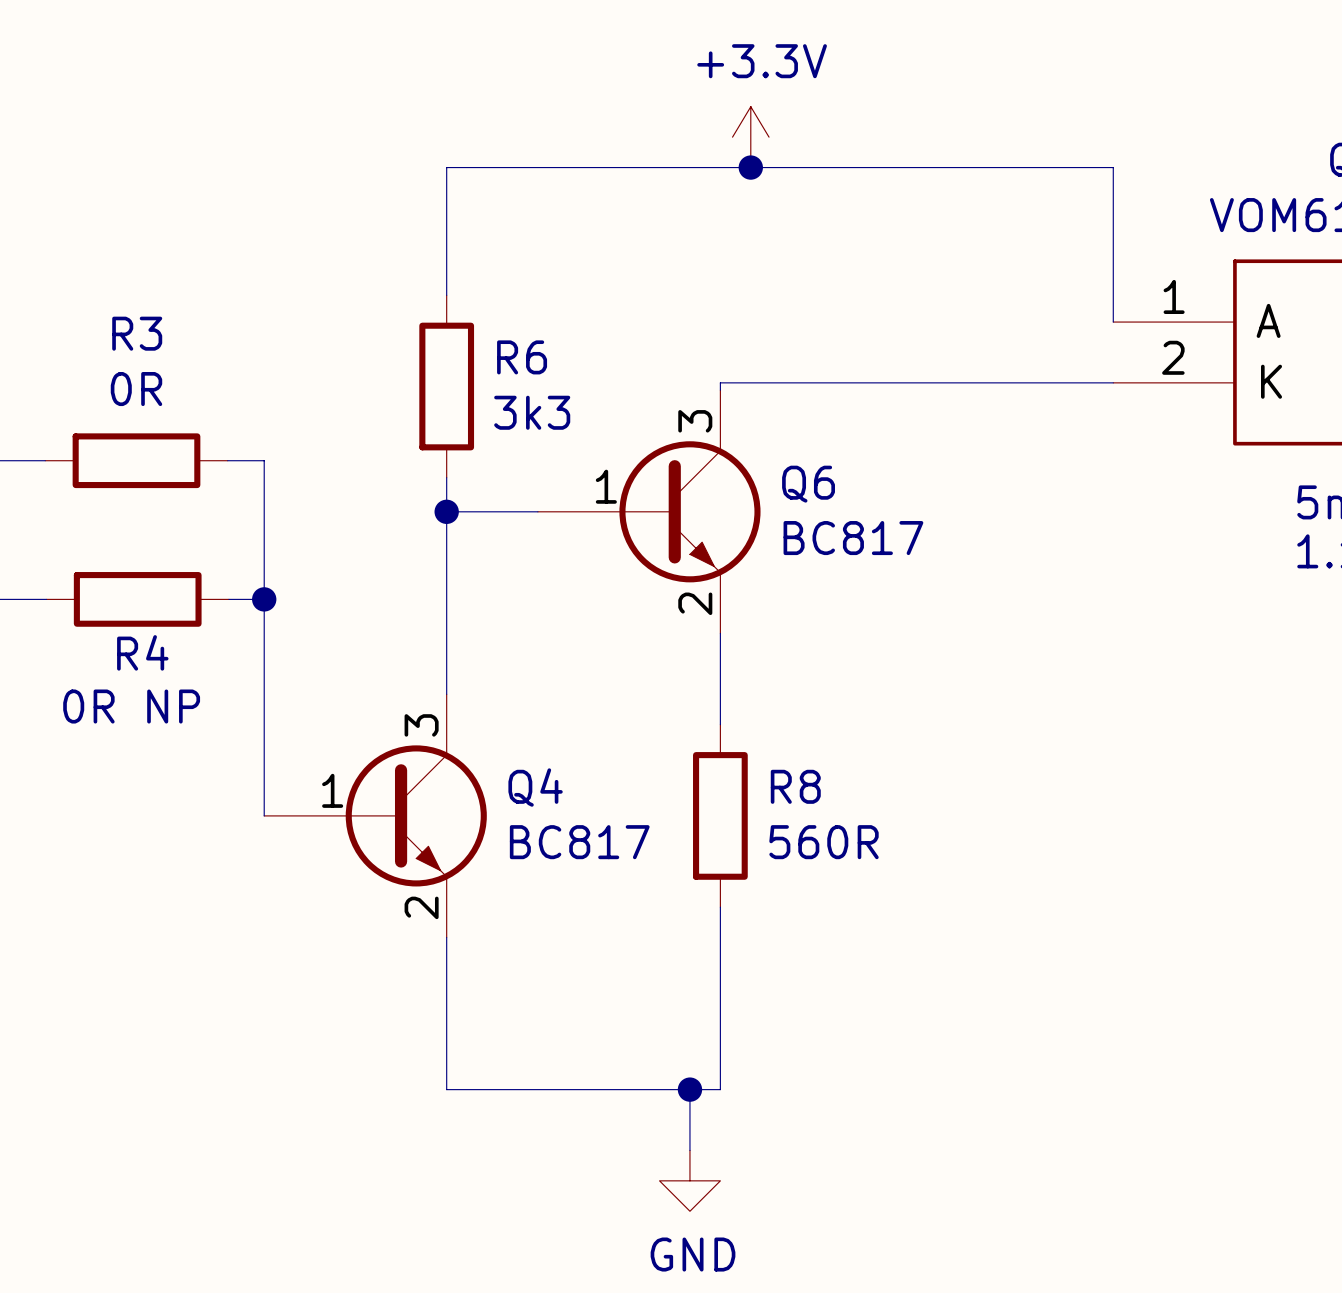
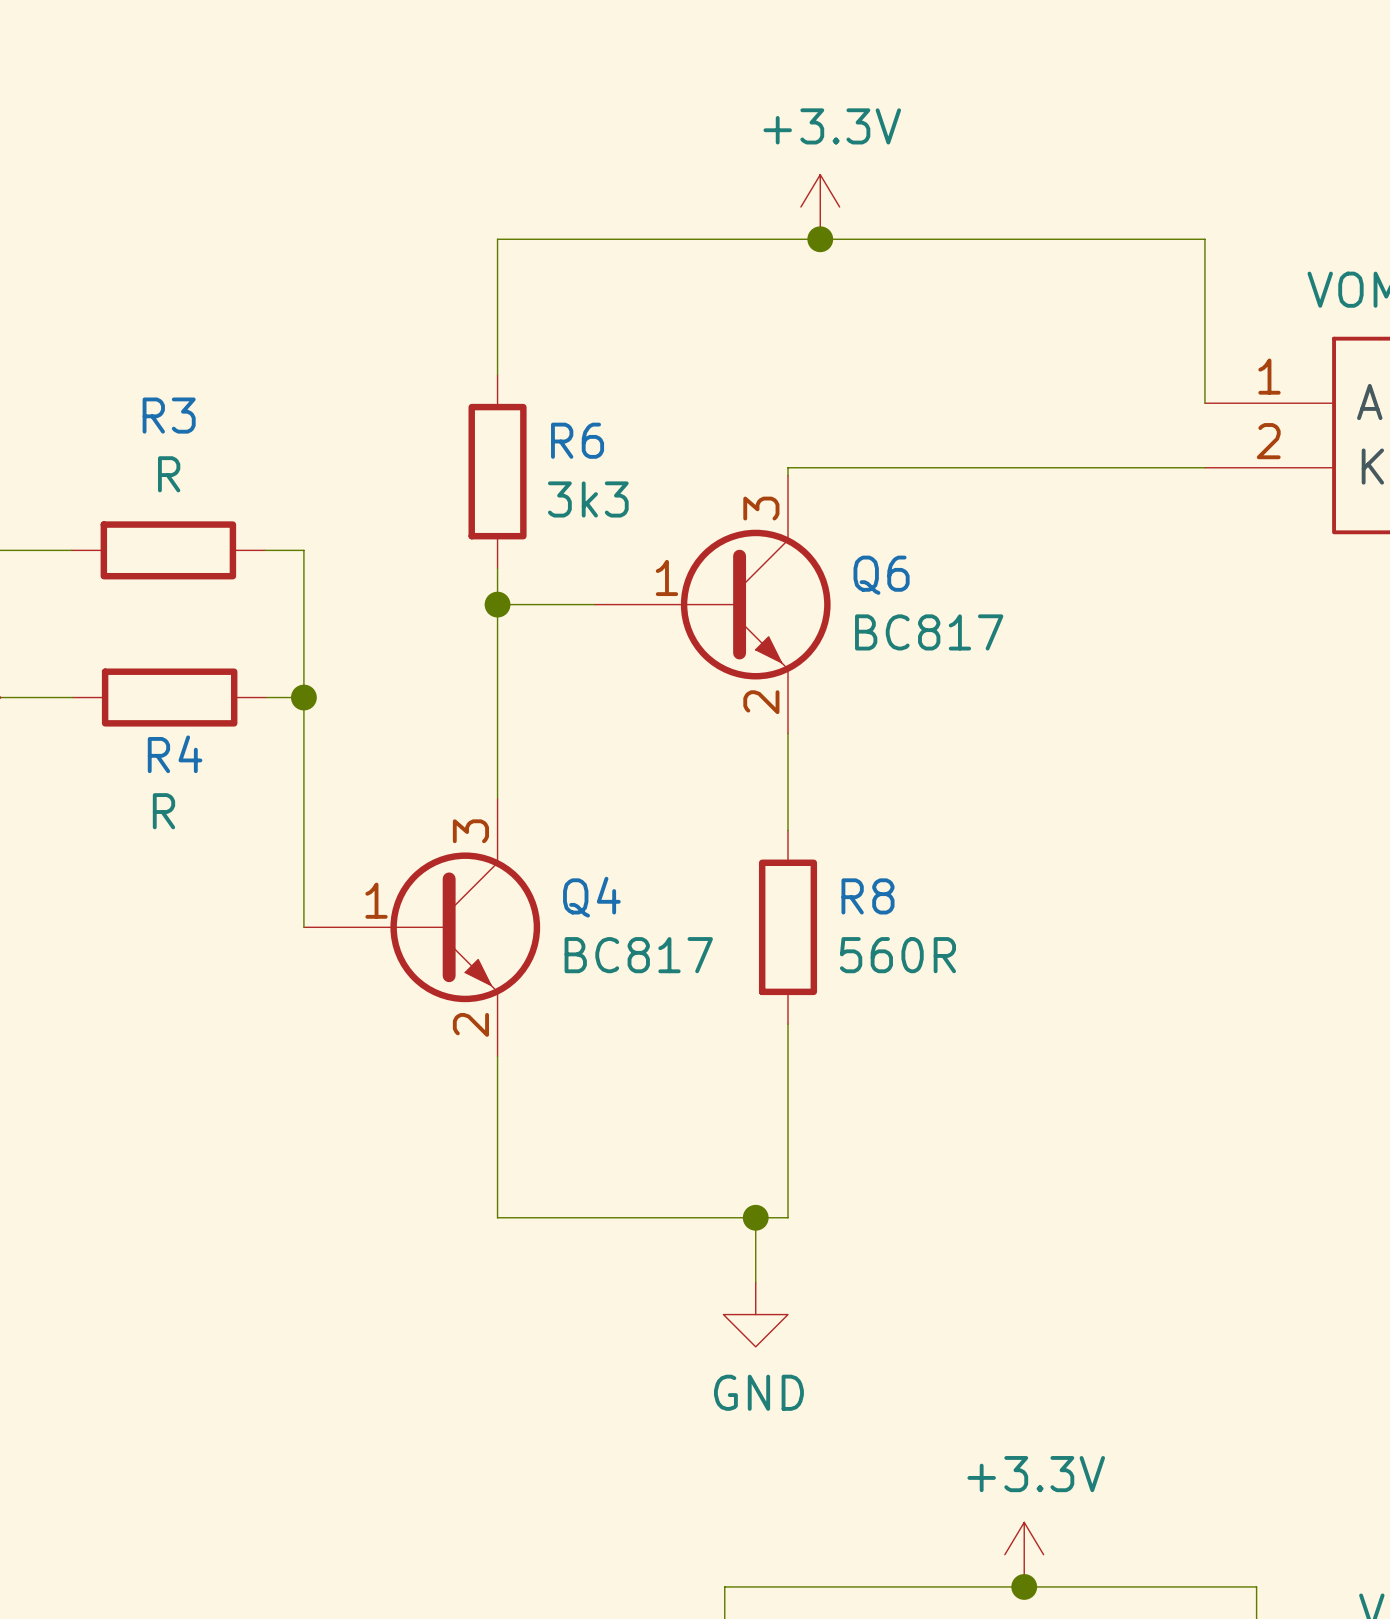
R3 value: 0R (136, 389) -> R (169, 474)
R4 value: 0R NP (131, 706) -> R (163, 811)

